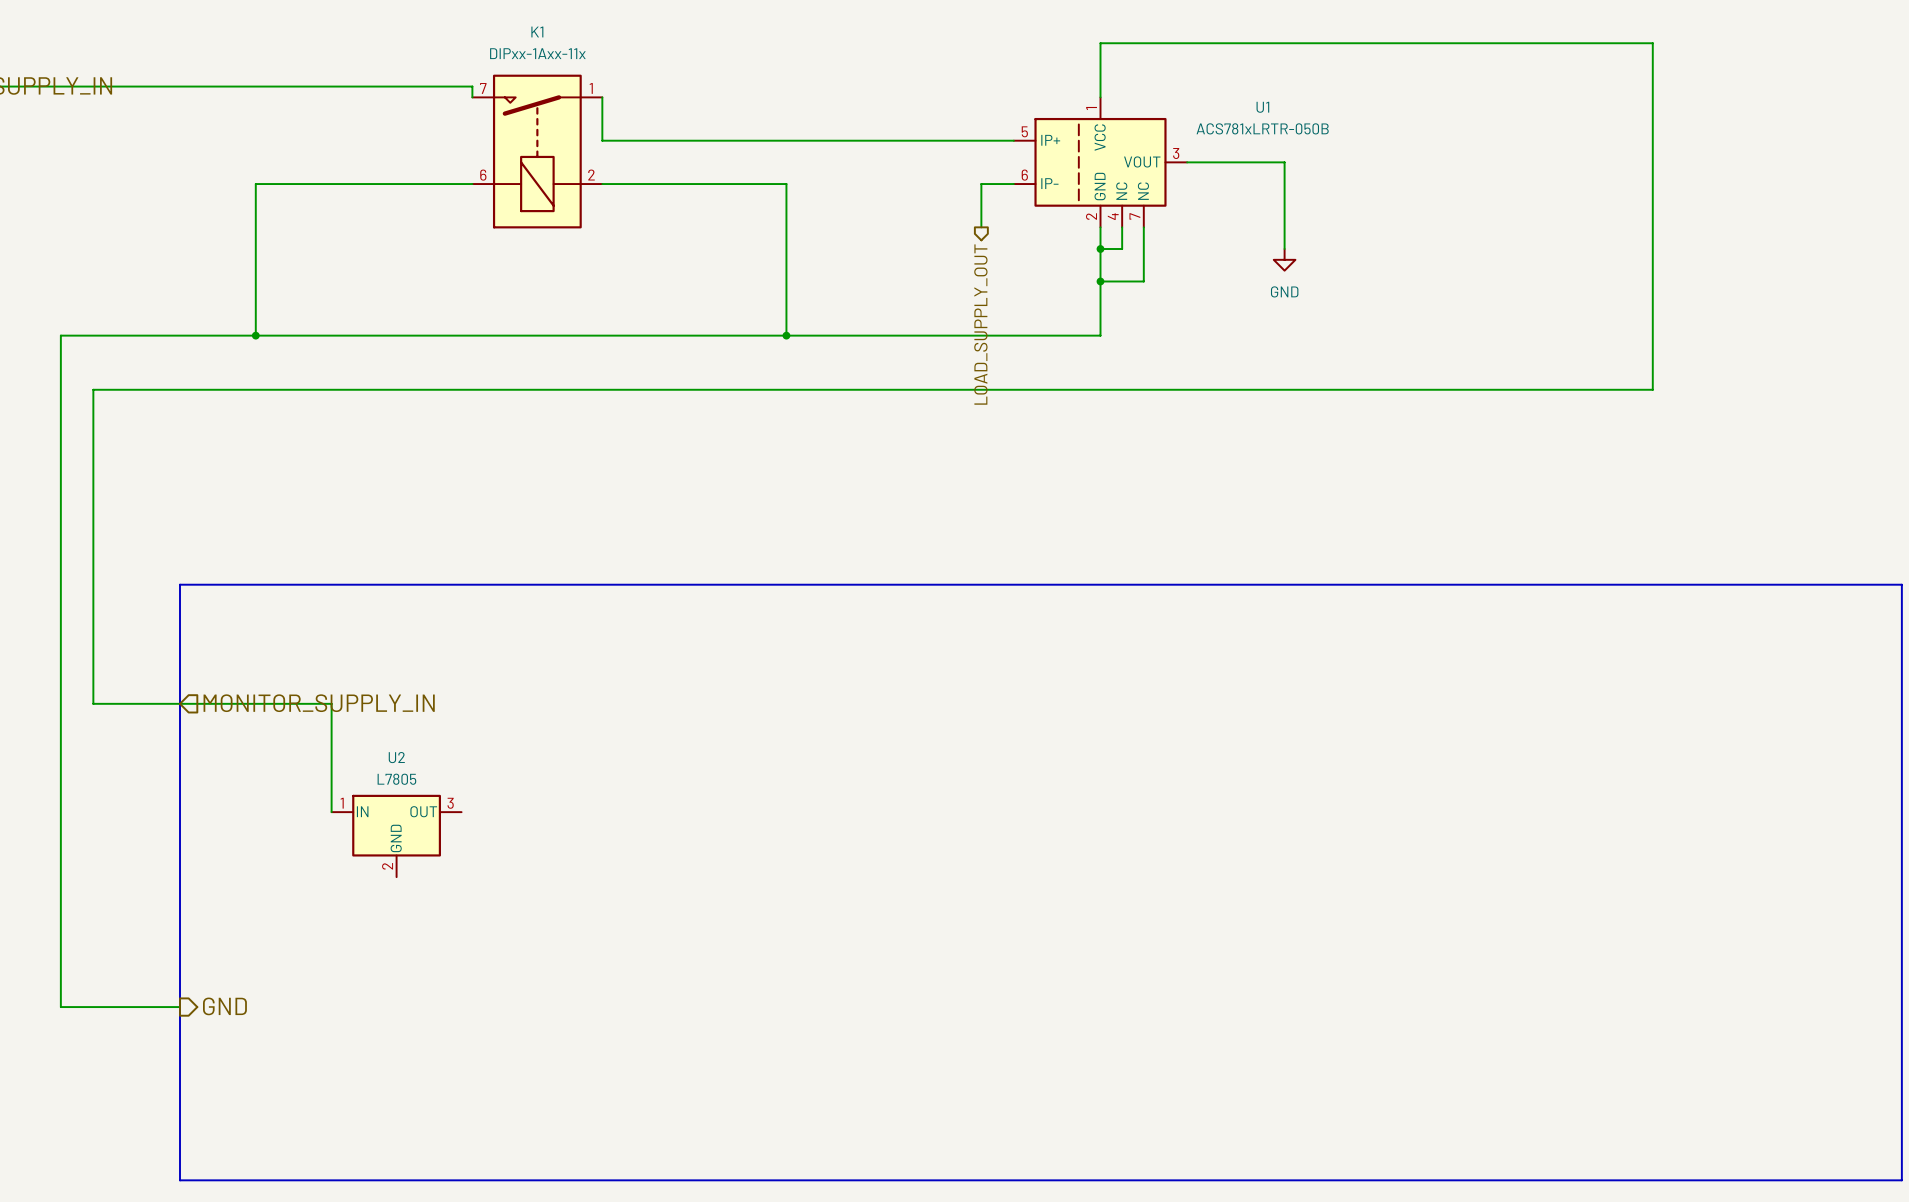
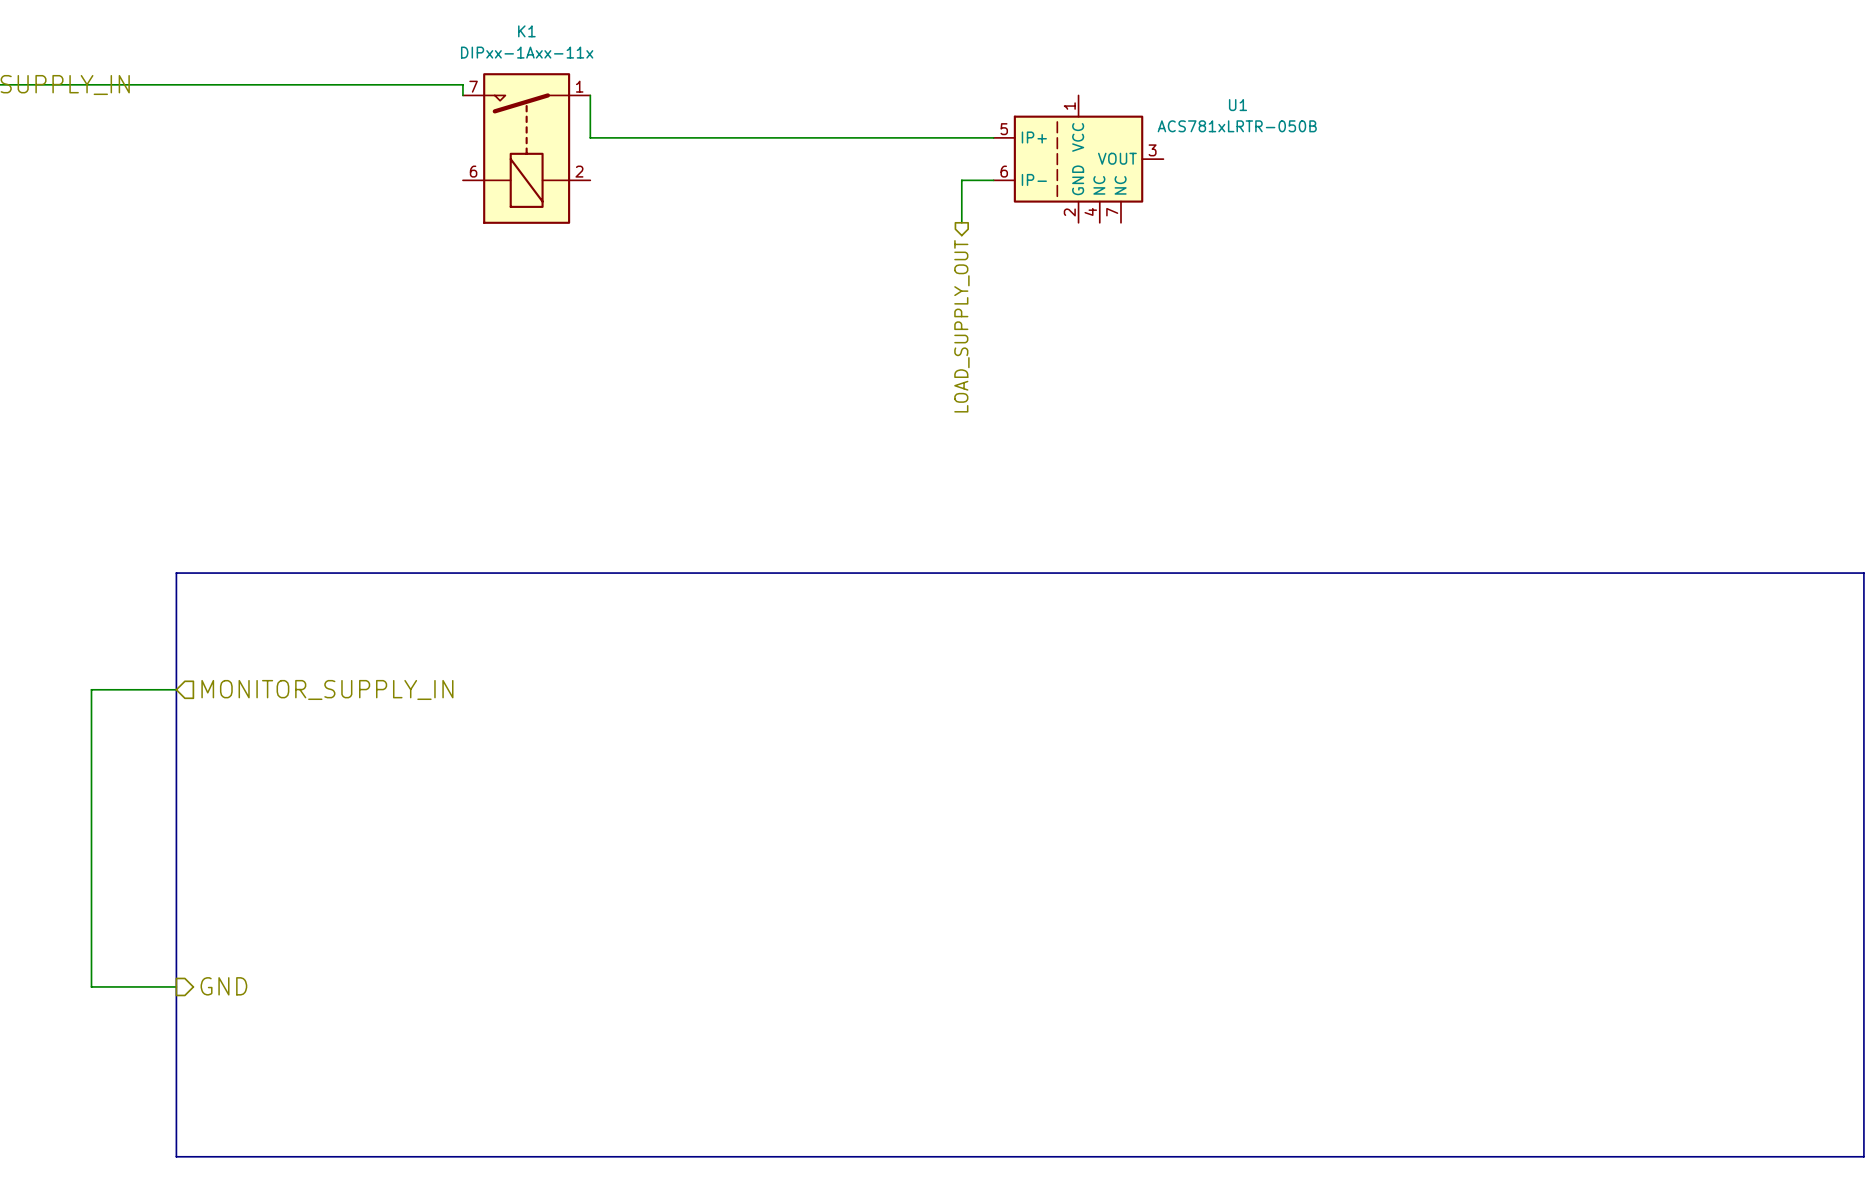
wire: (1100, 97) (1100, 43) (1652, 43) (1652, 389) (93, 389) (93, 703) -> none
wire: (1187, 162) (1284, 162) (1284, 249) -> none
wire: (472, 184) (255, 184) (255, 335) -> none
wire: (602, 184) (786, 184) (786, 335) -> none
wire: (1100, 227) (1100, 335) (60, 335) (60, 1007) (93, 1007) -> (91, 689) (91, 986)
wire: (1122, 227) (1122, 249) (1100, 249) -> none
wire: (1143, 227) (1143, 281) (1100, 281) -> none
junction: (1100, 249) -> none
power symbol: GND (1284, 259) -> none
junction: (1100, 281) -> none
junction: (255, 335) -> none
junction: (786, 335) -> none
wire: (179, 703) (331, 703) (331, 812) -> none
U2: L7805 (396, 835) -> none

